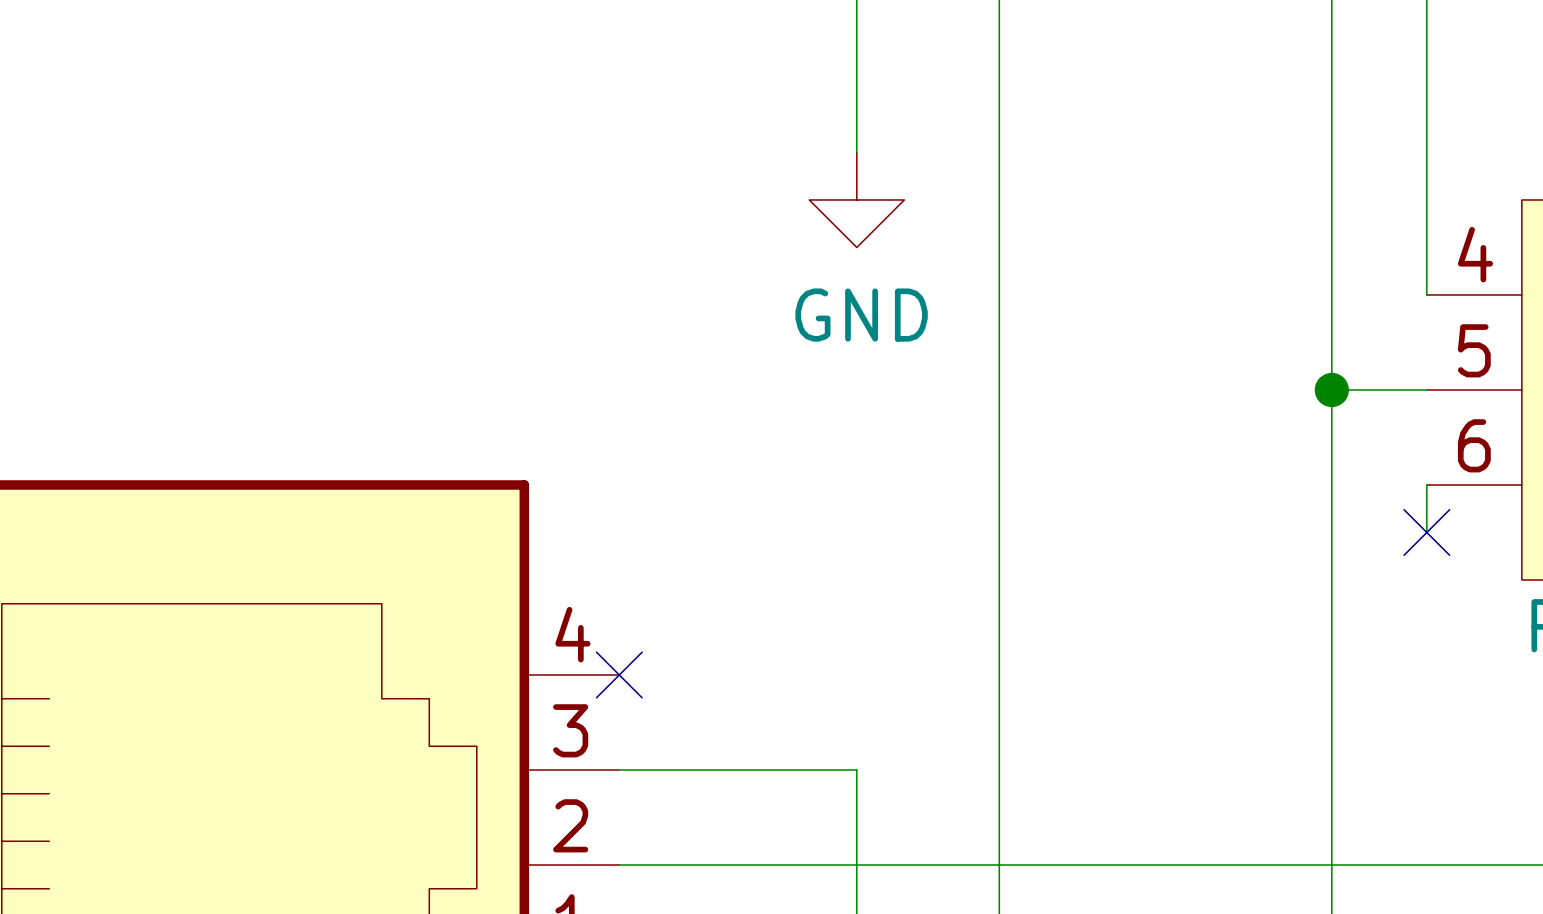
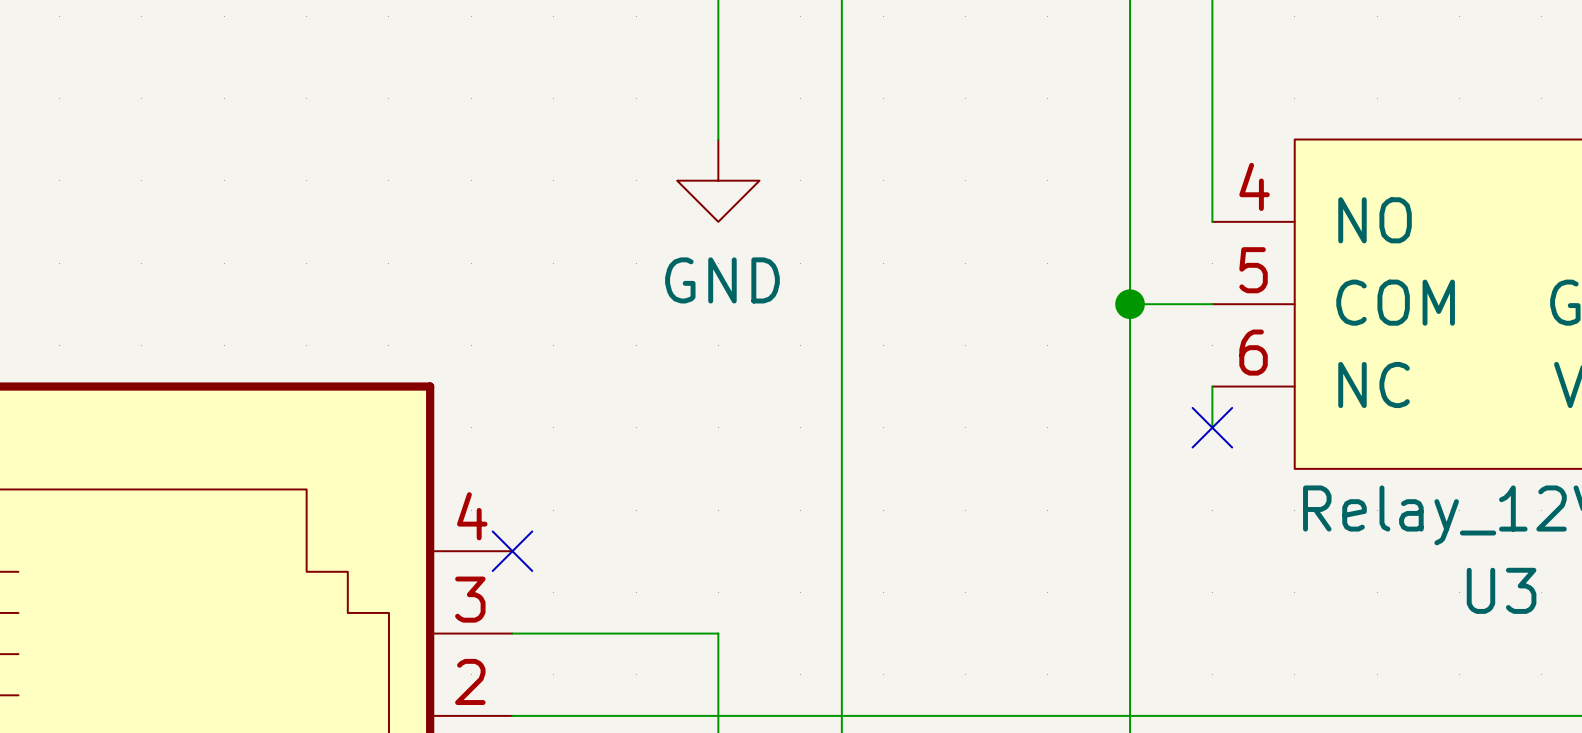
power symbol position: GND (856, 199) -> GND (718, 180)

